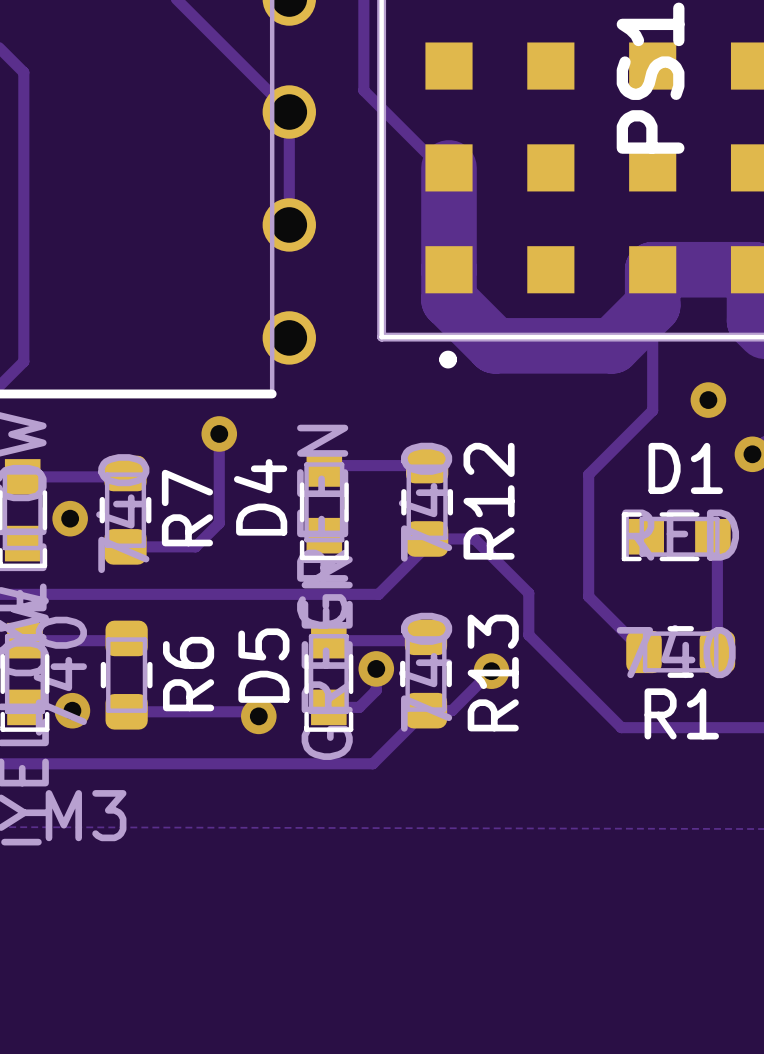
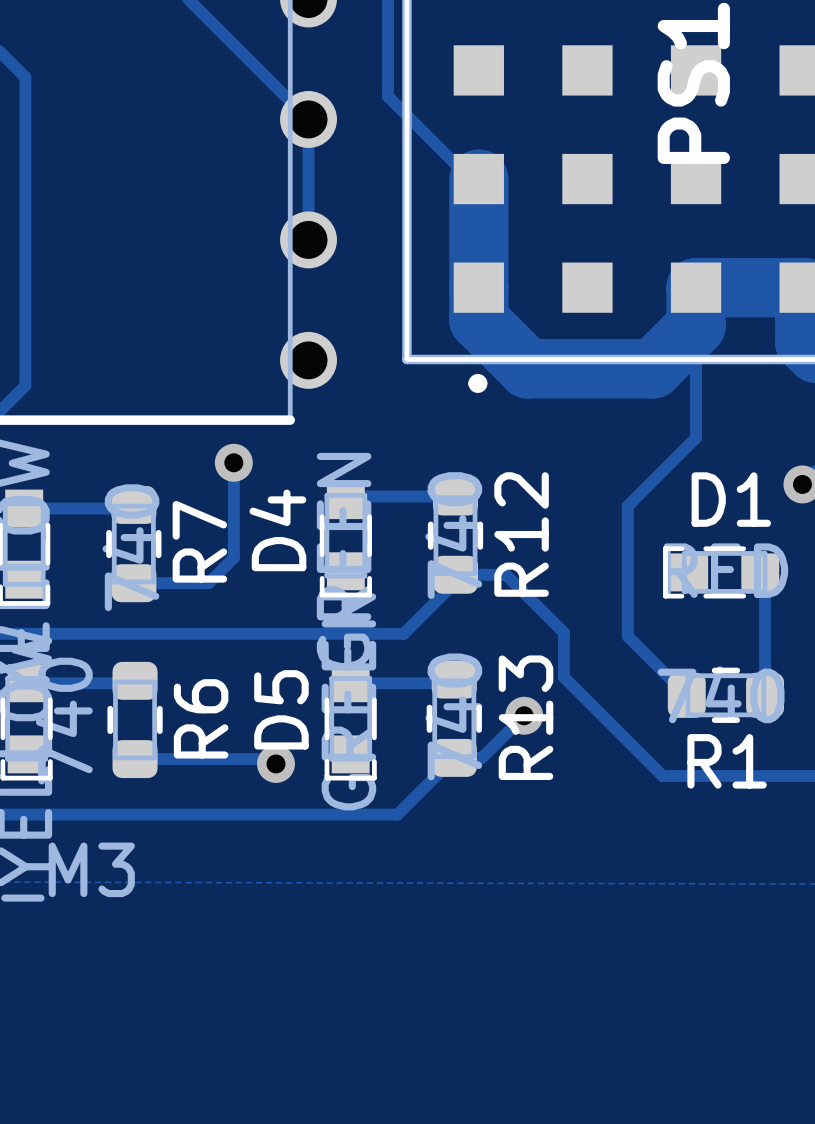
via: (708, 400) -> none
via: (70, 518) -> none
track: (376, 668) (376, 690) (359, 707) (328, 707) -> none
via: (376, 668) -> none
via: (72, 710) -> none

